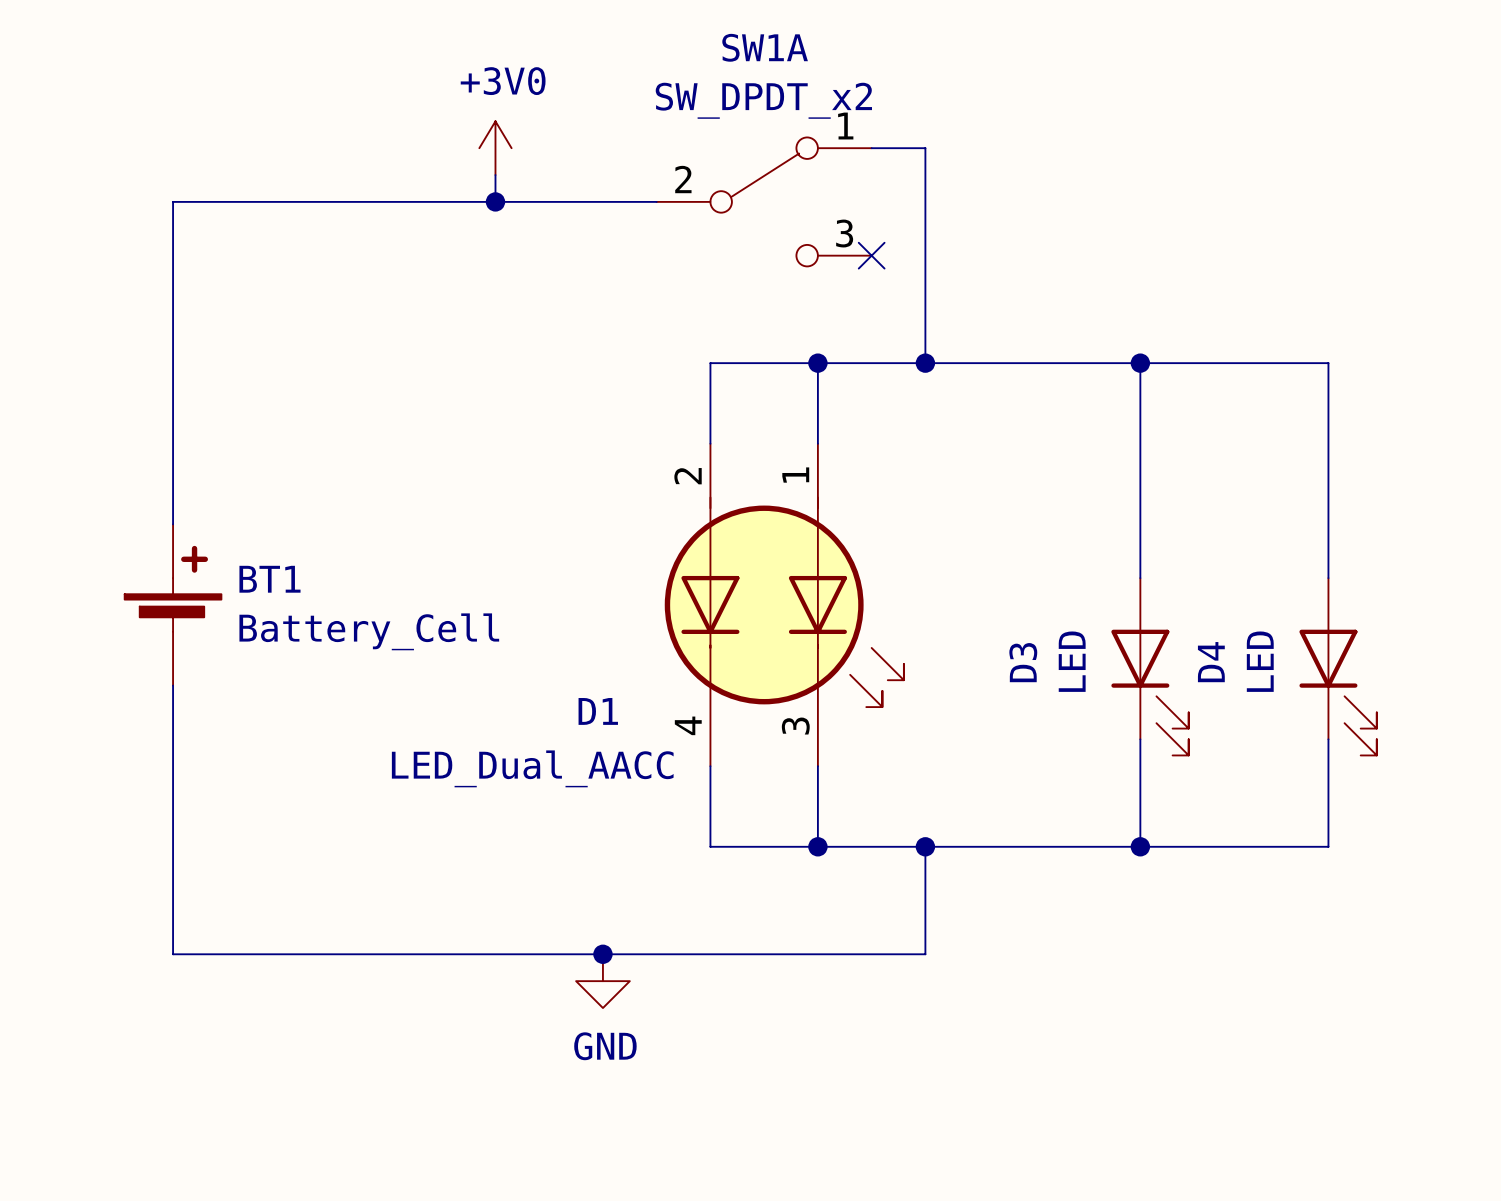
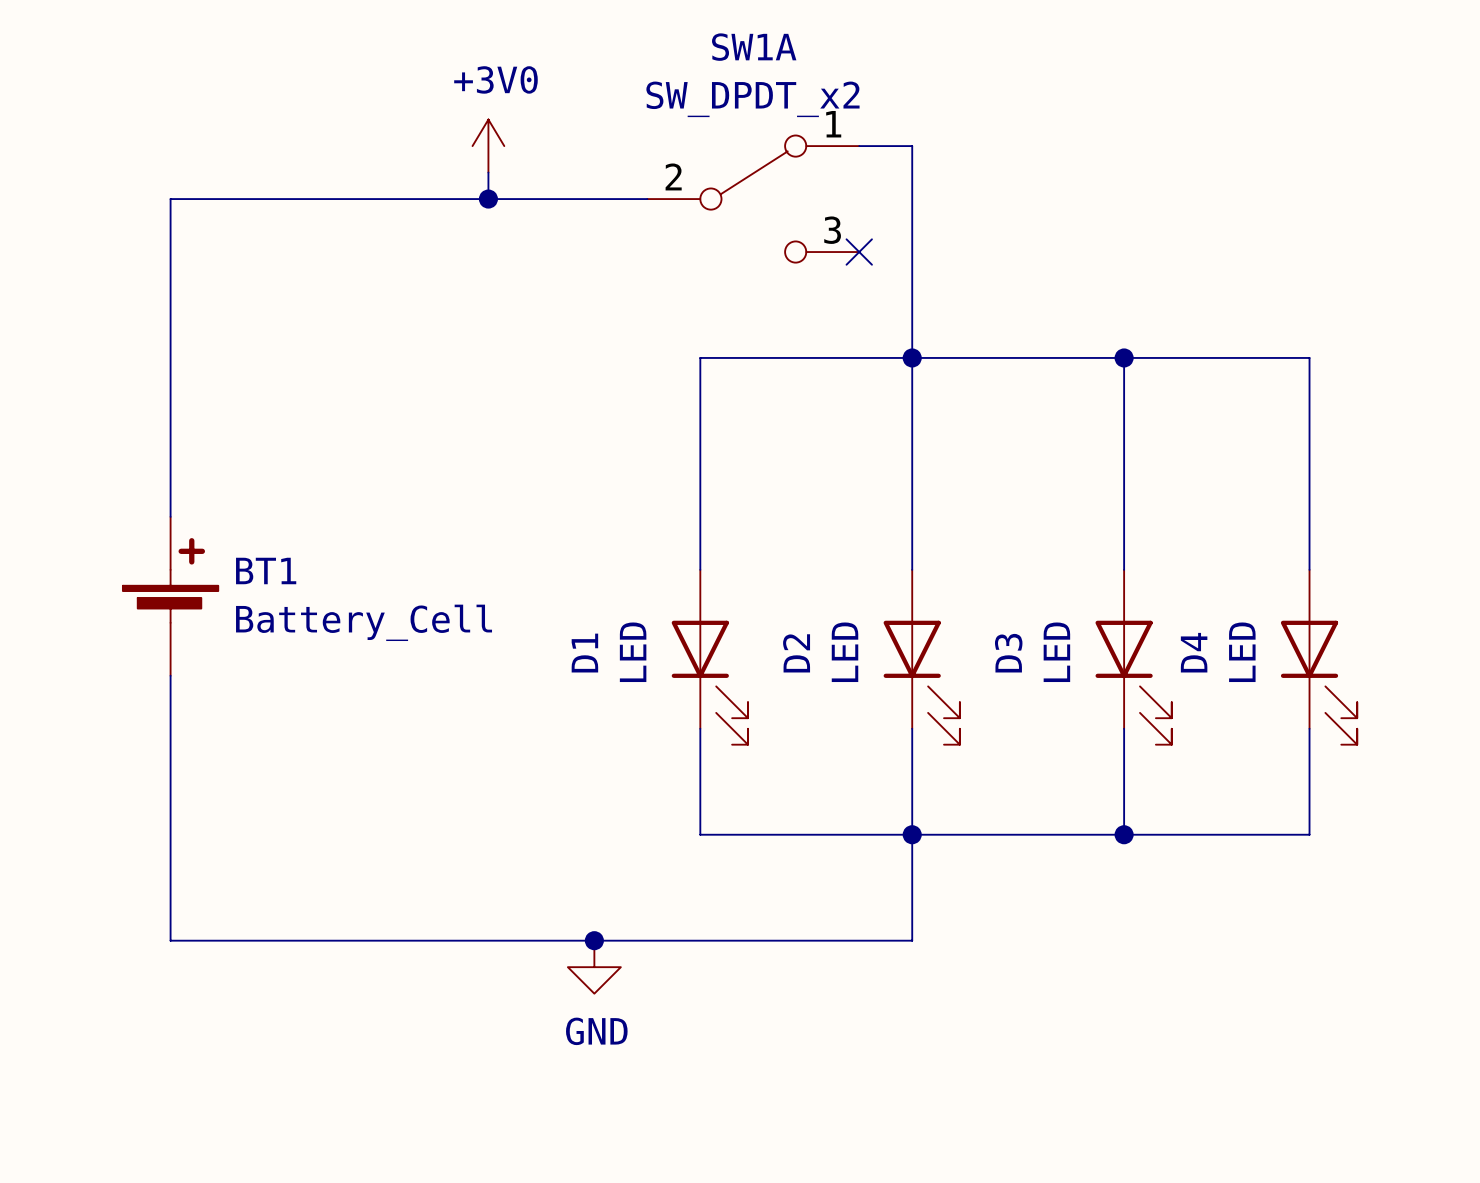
wire: (817, 363) (817, 443) -> none
junction: (817, 363) -> none
wire: none -> (912, 357) (912, 569)
D1 symbol: [664, 443, 904, 767] -> [671, 569, 749, 745]
D2: none -> LED (921, 657)
D1 name position: D1 (598, 711) -> D1 (584, 653)
wire: none -> (912, 728) (912, 834)
wire: (817, 766) (817, 846) -> none
D1 value: LED_Dual_AACC (532, 768) -> LED (633, 652)
junction: (817, 846) -> none

